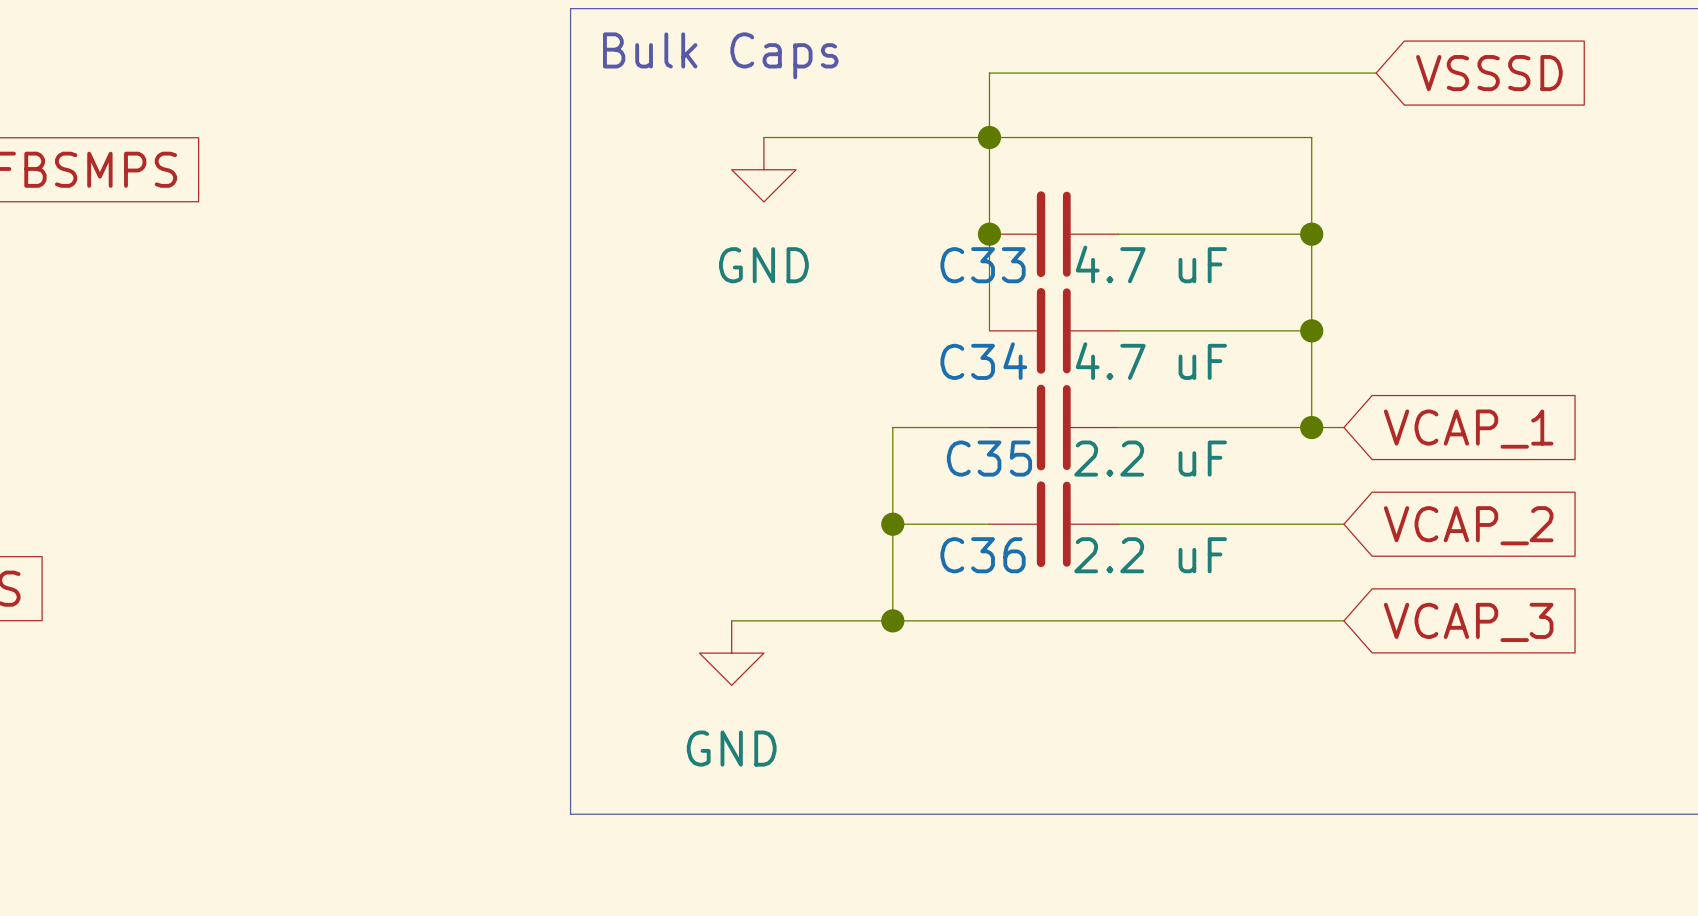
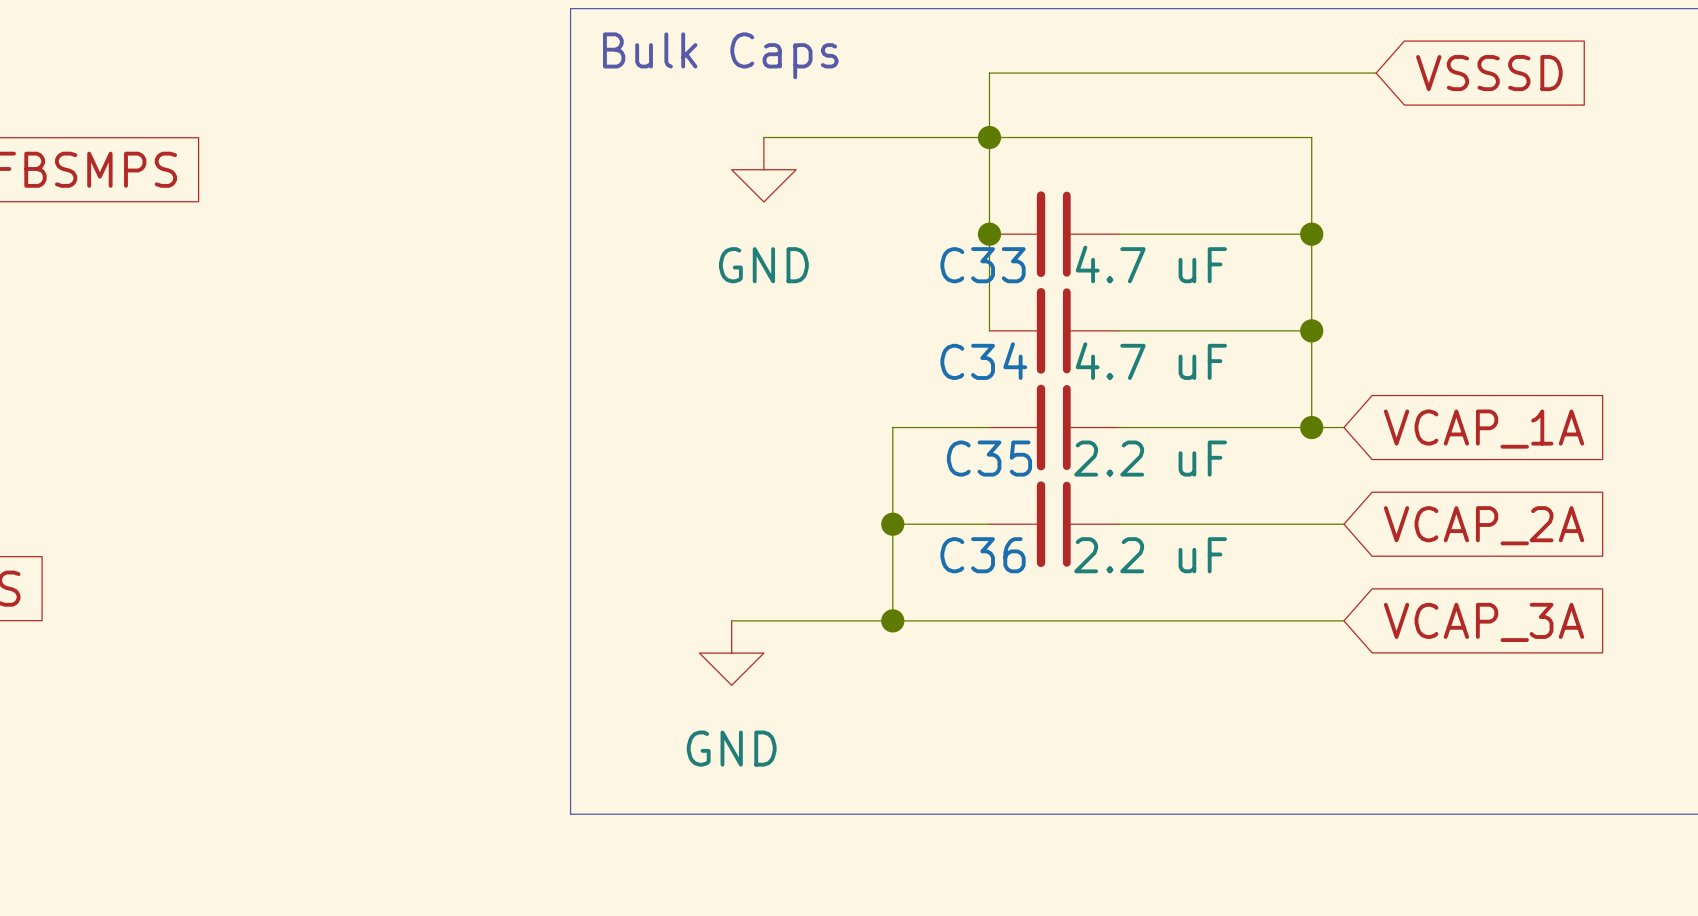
global label: VCAP_1 (1468, 429) -> VCAP_1A (1484, 429)
global label: VCAP_2 (1468, 525) -> VCAP_2A (1484, 525)
global label: VCAP_3 (1468, 622) -> VCAP_3A (1484, 622)

